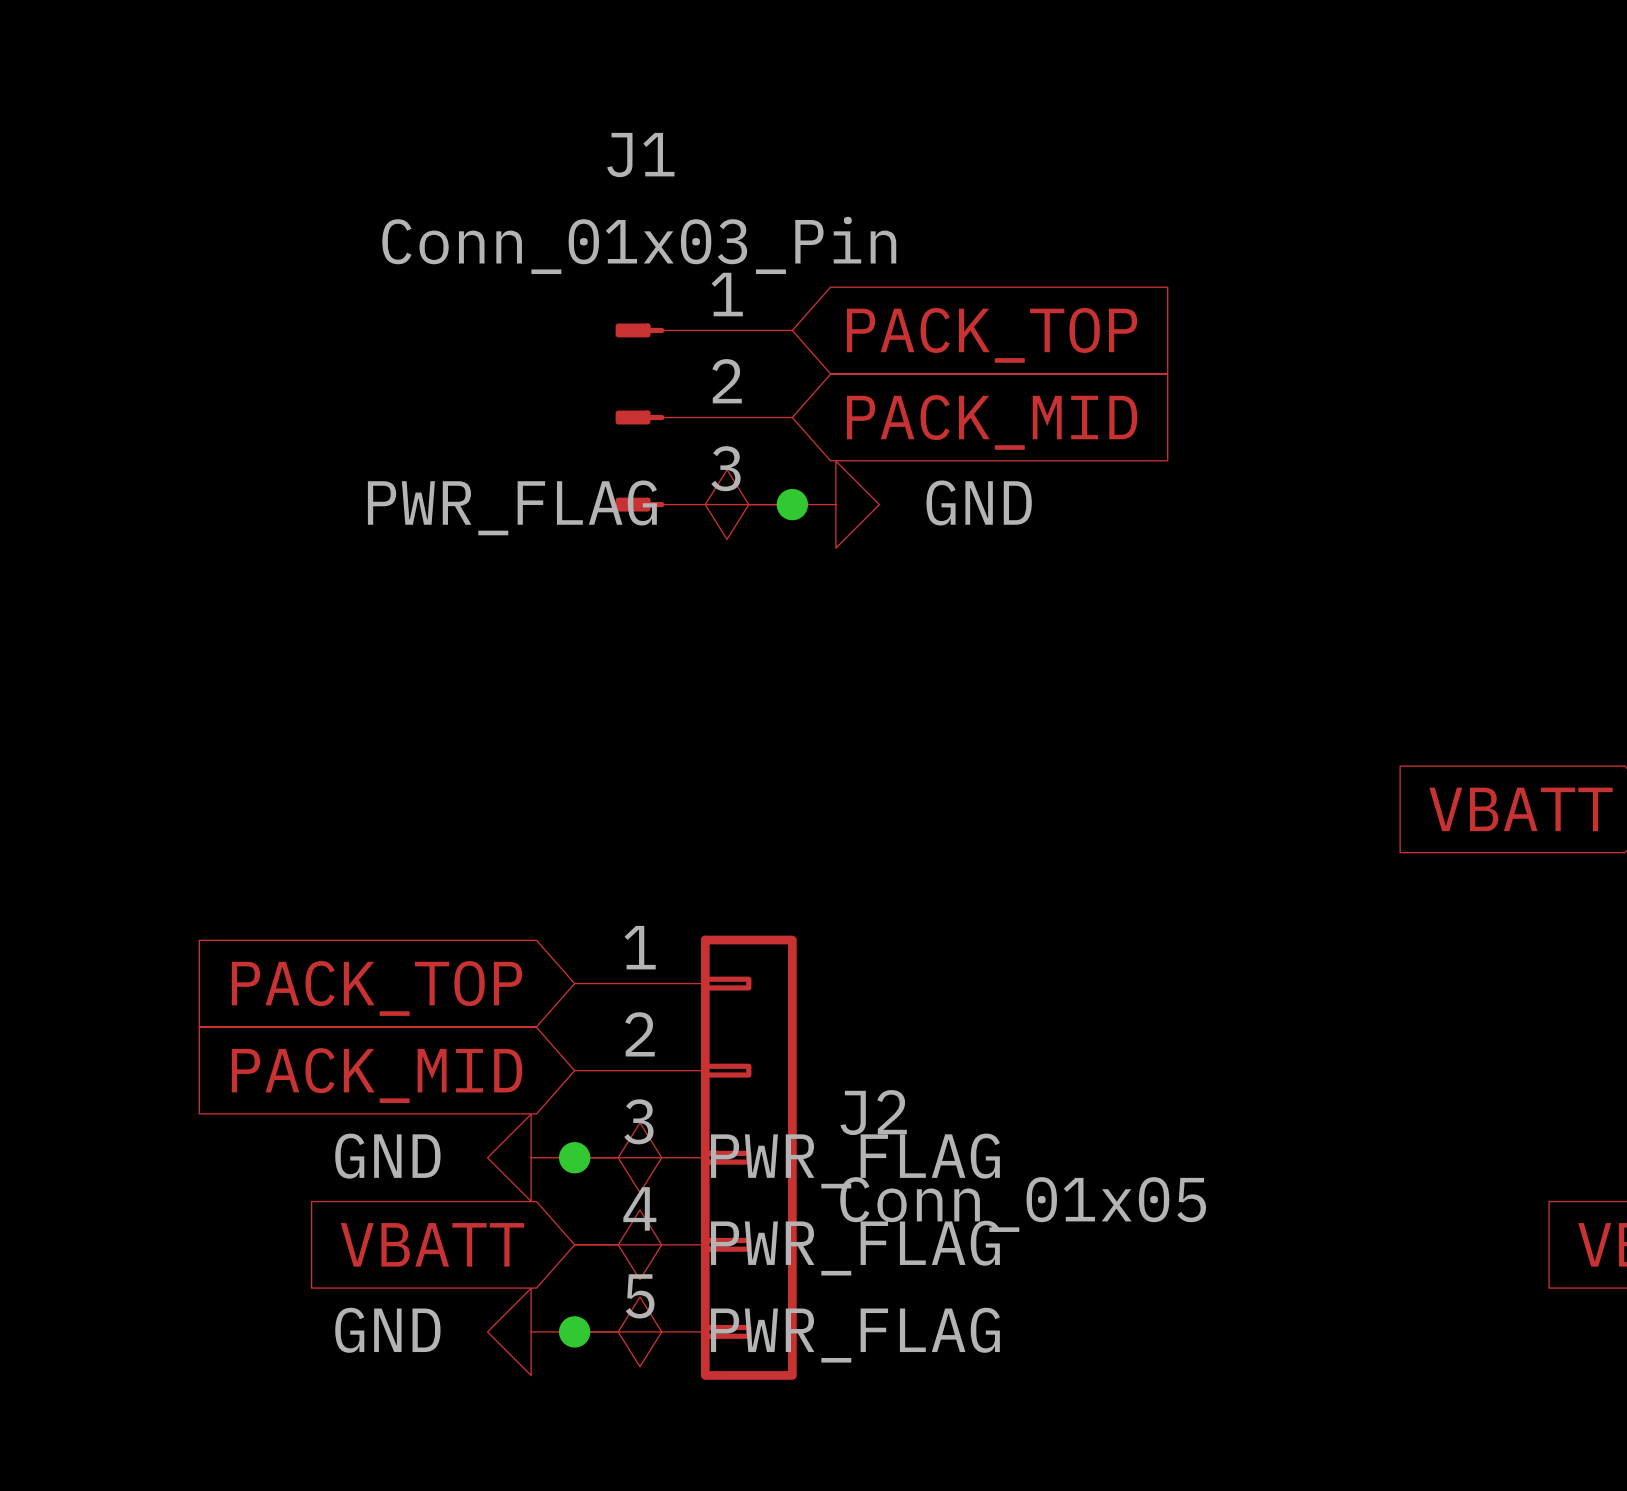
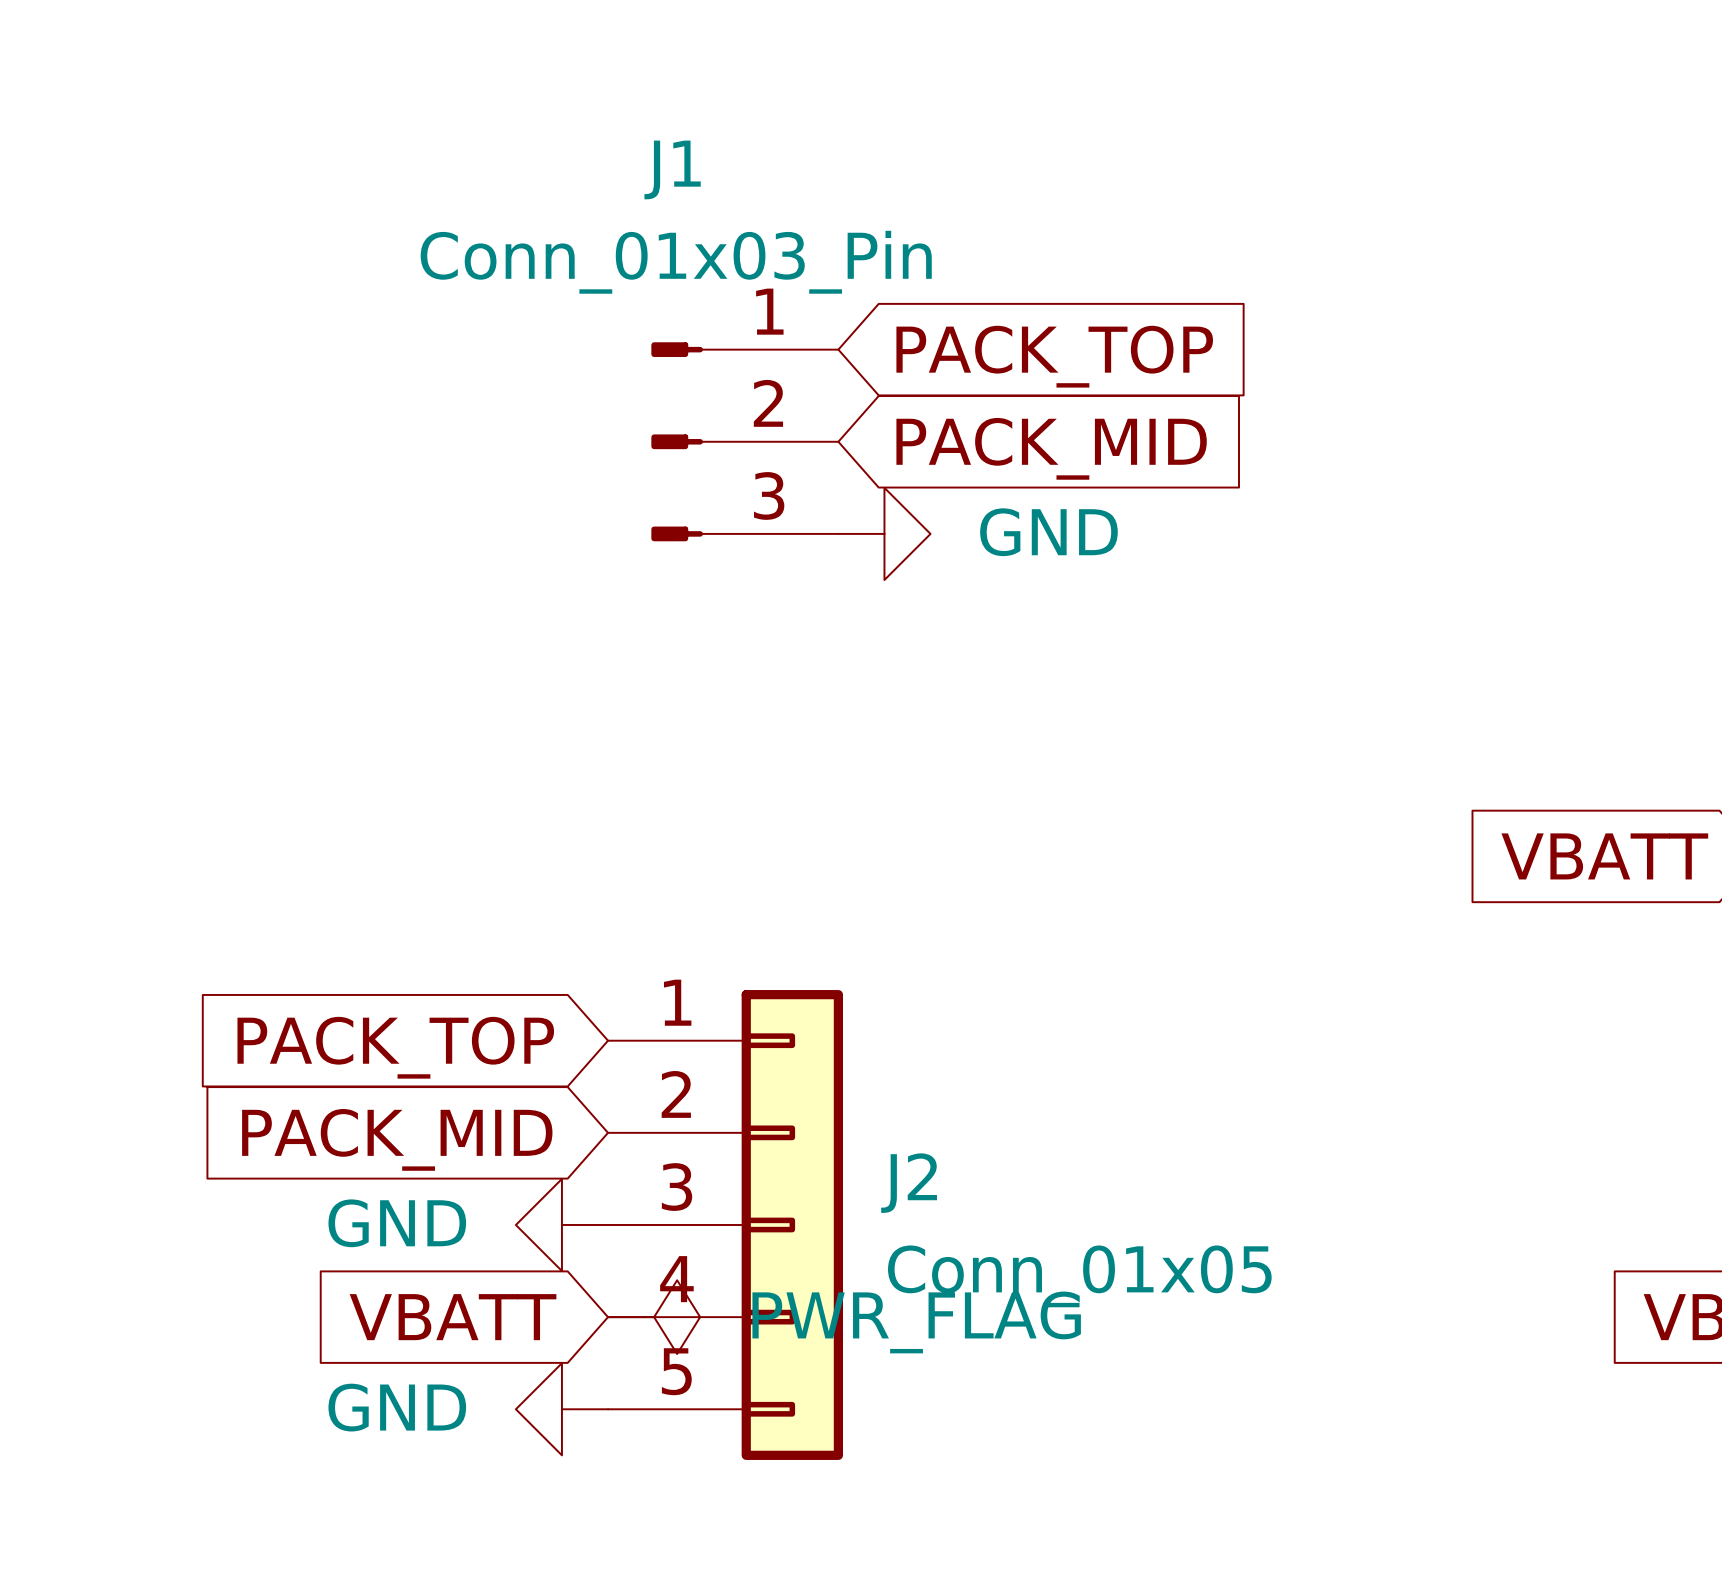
power symbol: PWR_FLAG (748, 504) -> none
junction: (792, 504) -> none
junction: (574, 1157) -> none
power symbol: PWR_FLAG (618, 1157) -> none
junction: (574, 1331) -> none
power symbol: PWR_FLAG (618, 1331) -> none

